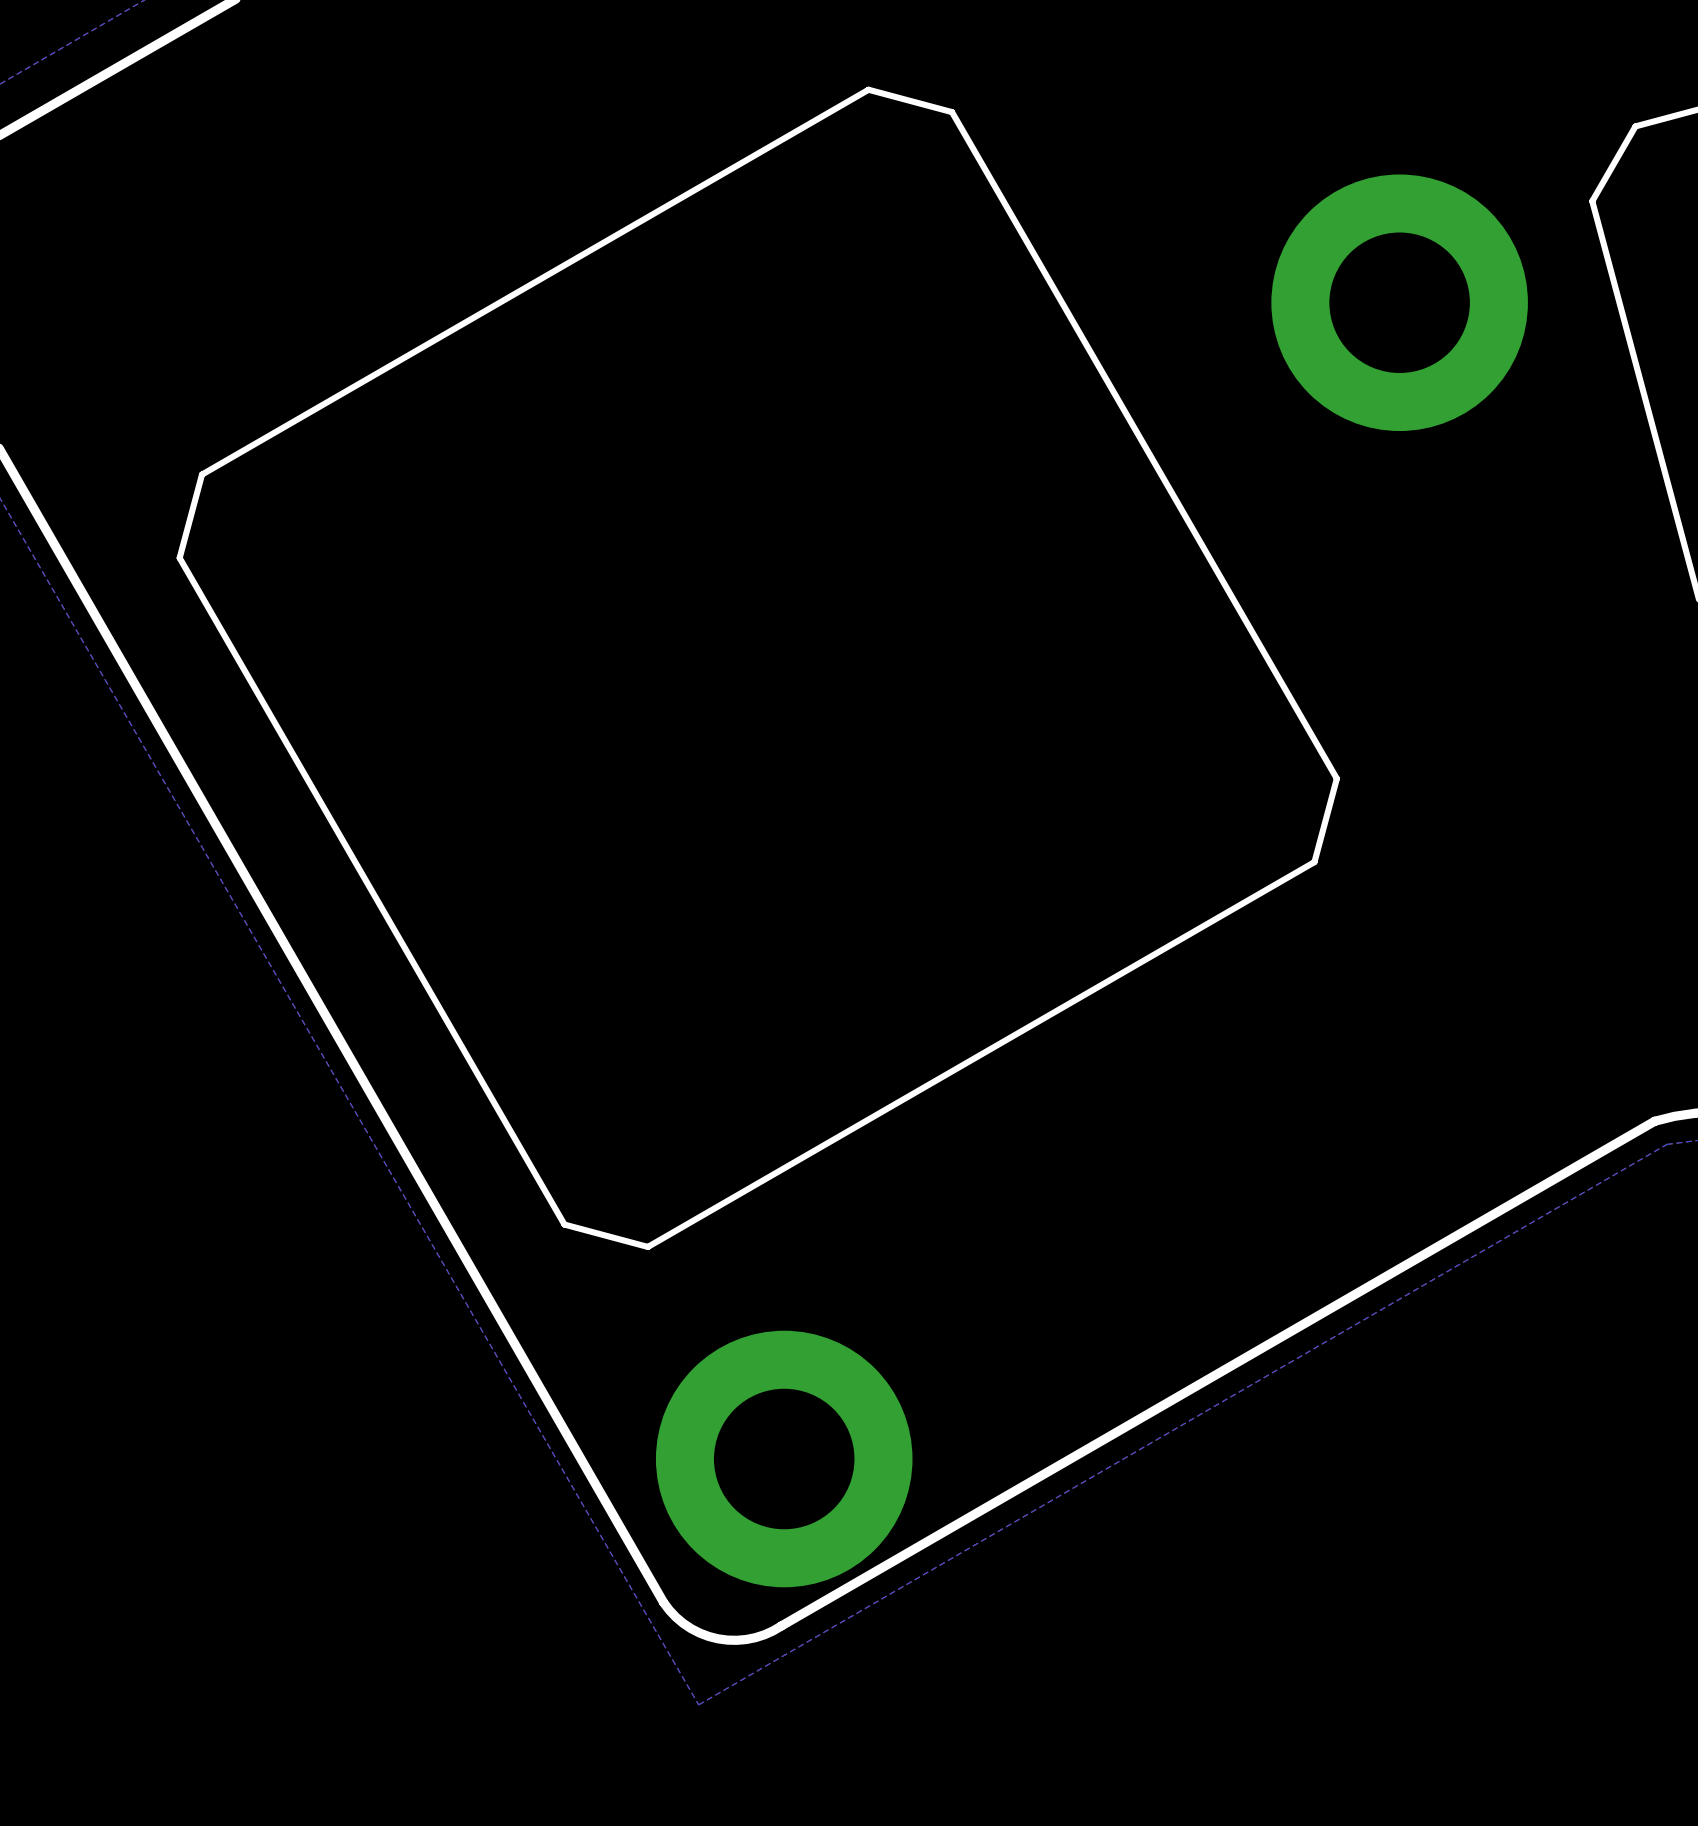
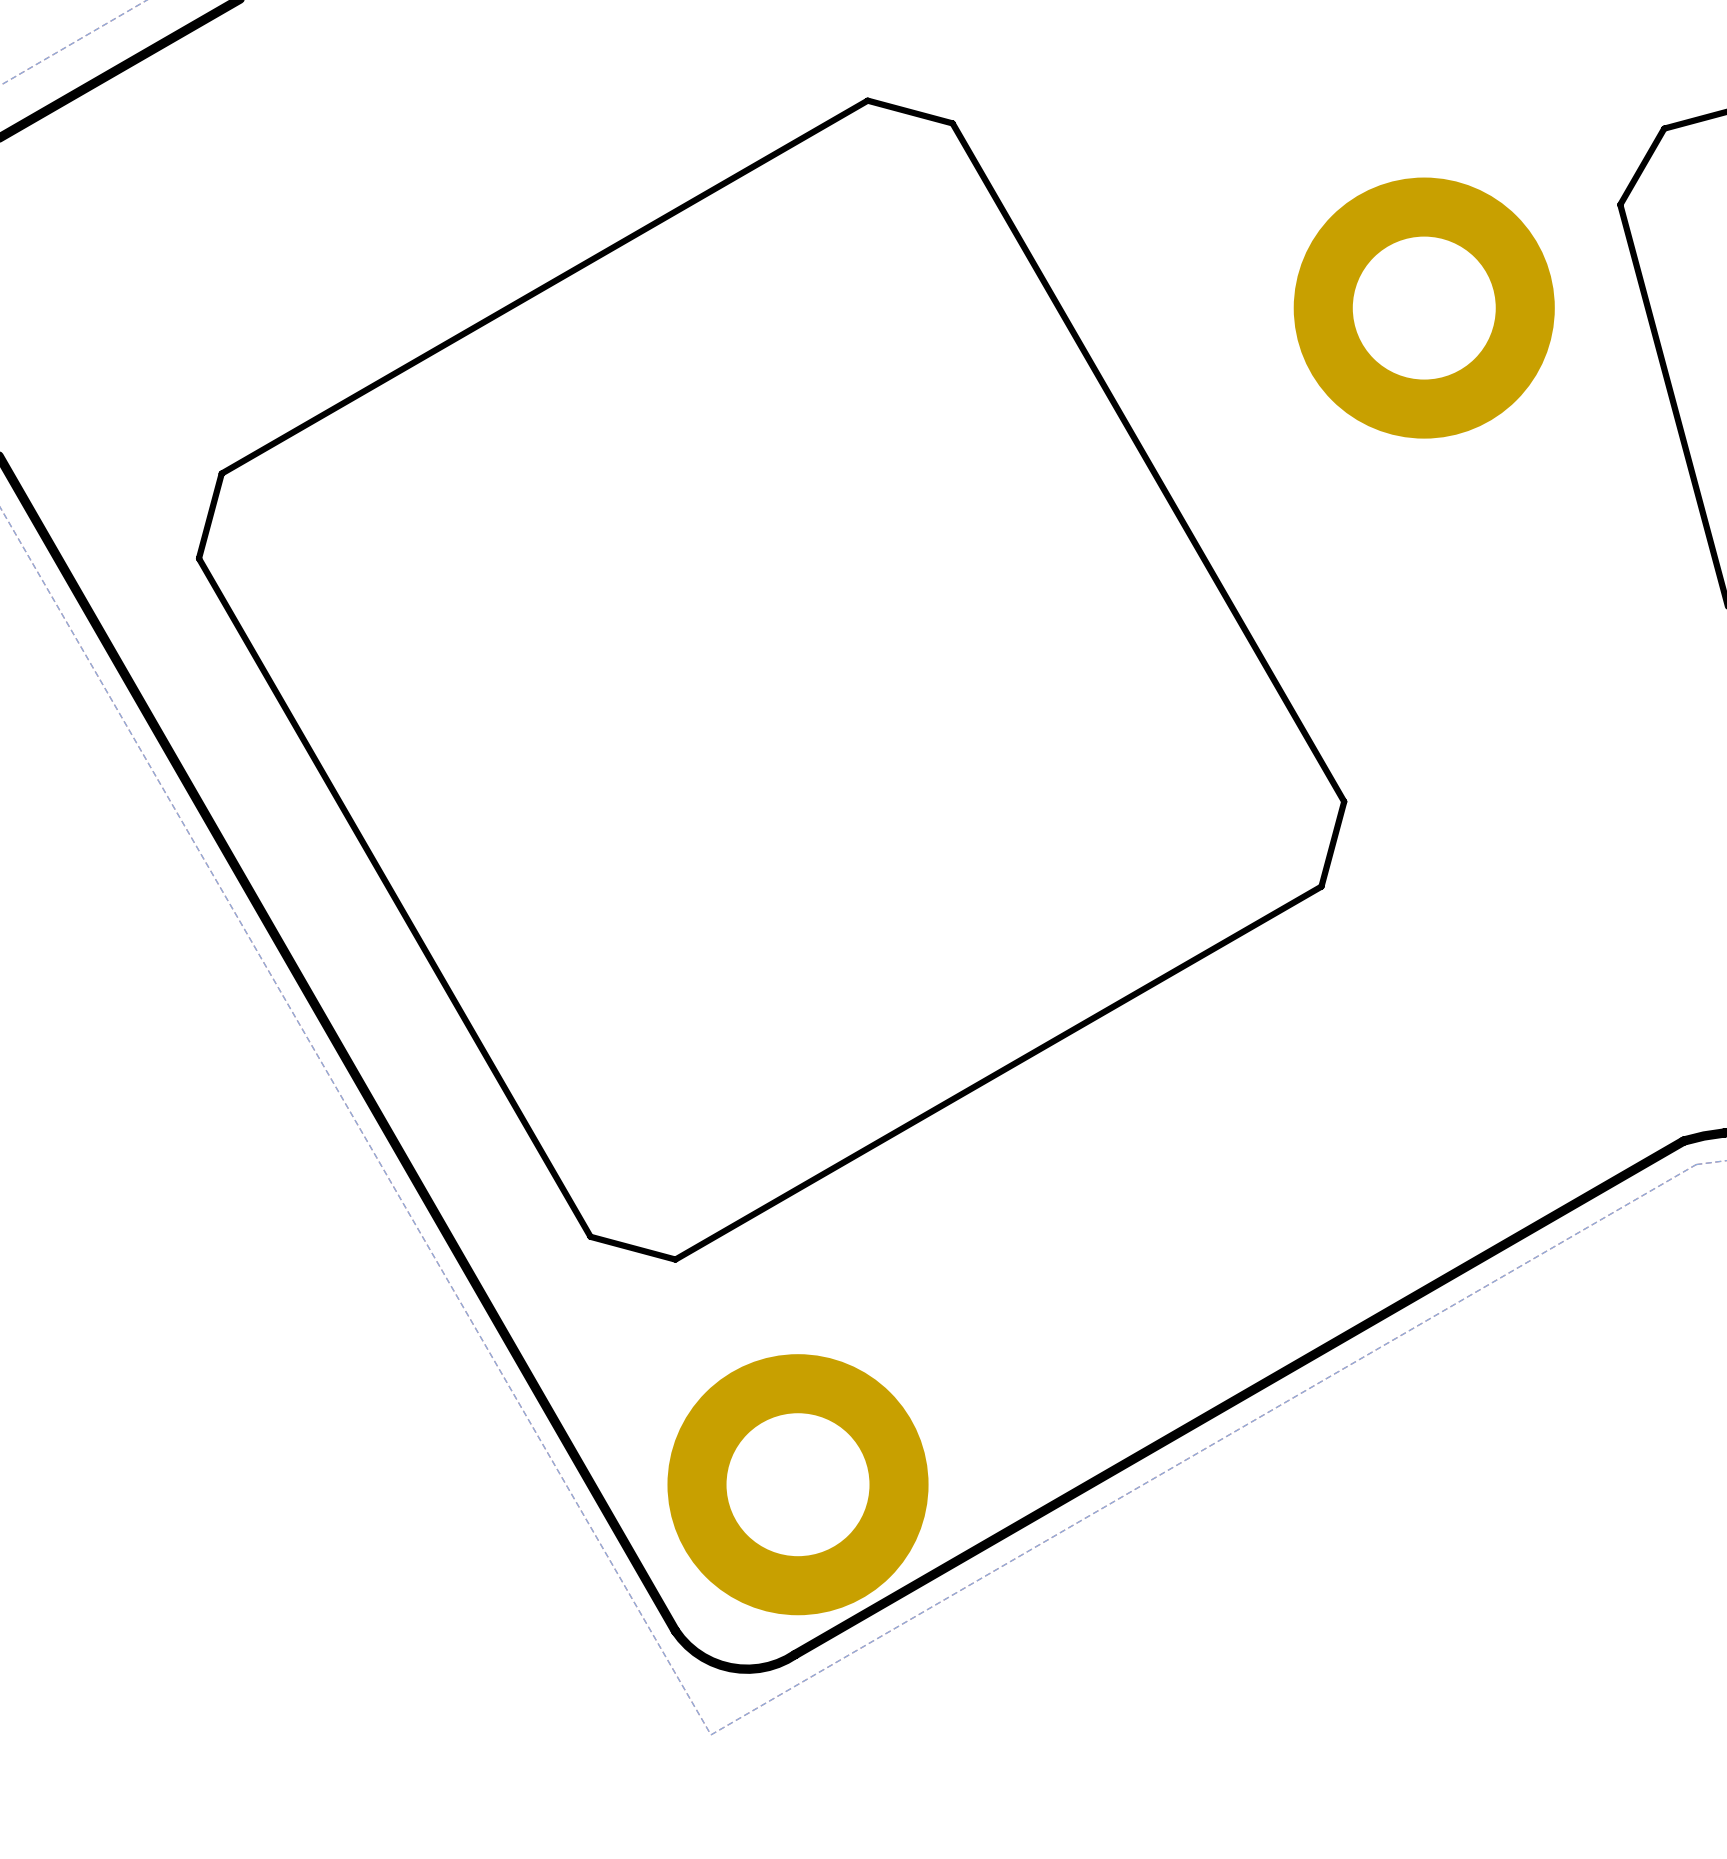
board edge: (852, 98) (868, 89) (952, 112) (1336, 778) (1314, 862) (1298, 871) -> (867, 100) (952, 123) (1344, 801) (1321, 886)
board edge: (217, 465) (202, 474) (179, 558) (564, 1224) (647, 1246) (663, 1237) -> (221, 473) (198, 558) (590, 1236) (675, 1259)

